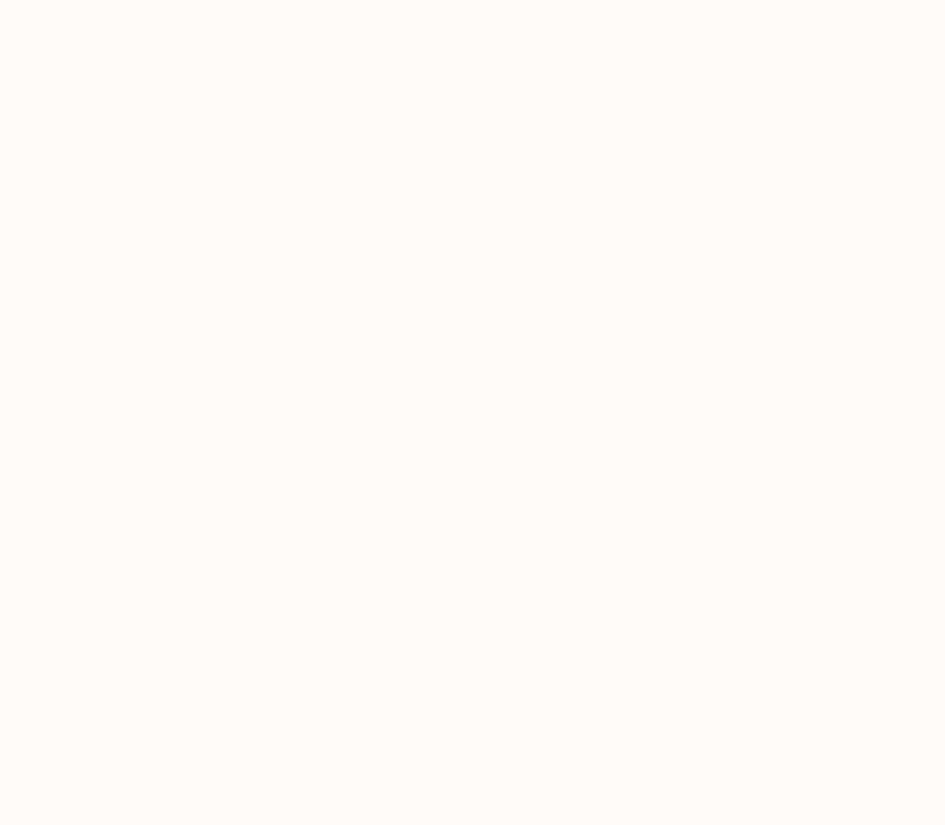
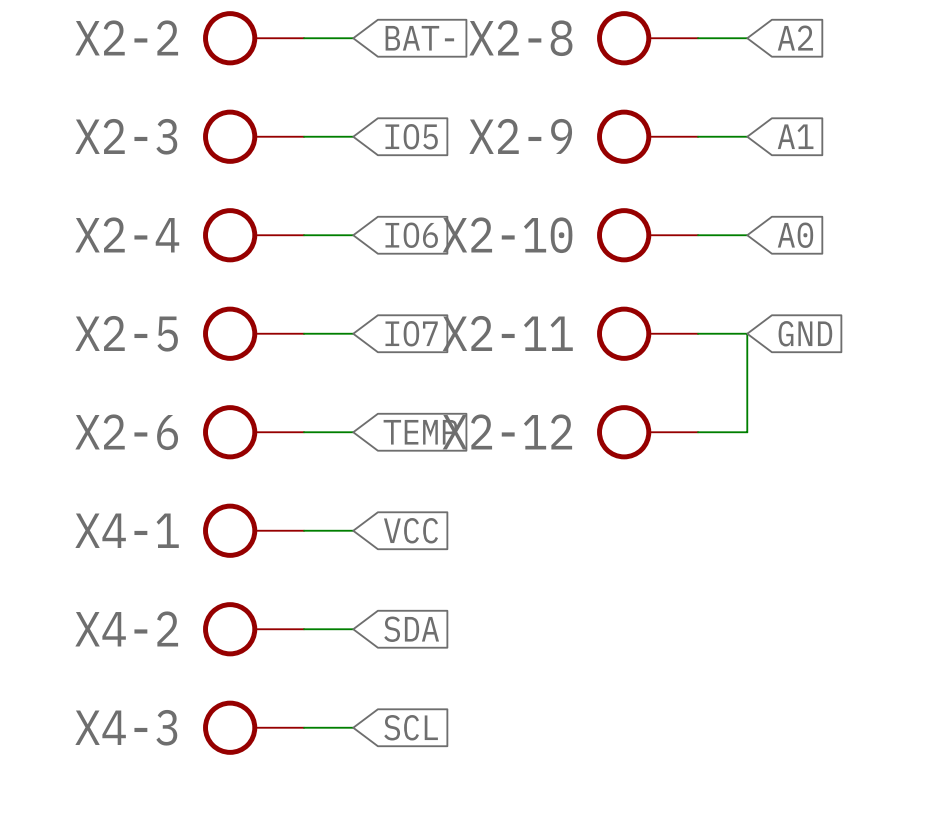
X2-2: none -> (253, 38)
wire: none -> (304, 38) (353, 38)
global label: none -> BAT- (419, 38)
X2-8: none -> (647, 38)
wire: none -> (698, 38) (747, 38)
global label: none -> A2 (795, 38)
X2-3: none -> (253, 136)
wire: none -> (304, 136) (353, 136)
global label: none -> IO5 (411, 136)
X2-9: none -> (647, 136)
wire: none -> (698, 136) (747, 136)
global label: none -> A1 (795, 136)
X2-4: none -> (253, 235)
wire: none -> (304, 235) (353, 235)
global label: none -> IO6 (411, 235)
X2-10: none -> (647, 235)
wire: none -> (698, 235) (747, 235)
global label: none -> A0 (795, 235)
X2-5: none -> (253, 333)
wire: none -> (304, 333) (353, 333)
global label: none -> IO7 (411, 333)
X2-11: none -> (647, 333)
wire: none -> (698, 333) (747, 333) (747, 432) (698, 432)
global label: none -> GND (805, 333)
X2-6: none -> (253, 432)
wire: none -> (304, 432) (353, 432)
global label: none -> TEMP (420, 432)
X2-12: none -> (647, 432)
X4-1: none -> (253, 530)
wire: none -> (304, 530) (353, 530)
global label: none -> VCC (410, 530)
X4-2: none -> (253, 629)
wire: none -> (304, 629) (353, 629)
global label: none -> SDA (411, 629)
X4-3: none -> (253, 727)
wire: none -> (304, 727) (353, 727)
global label: none -> SCL (411, 727)

